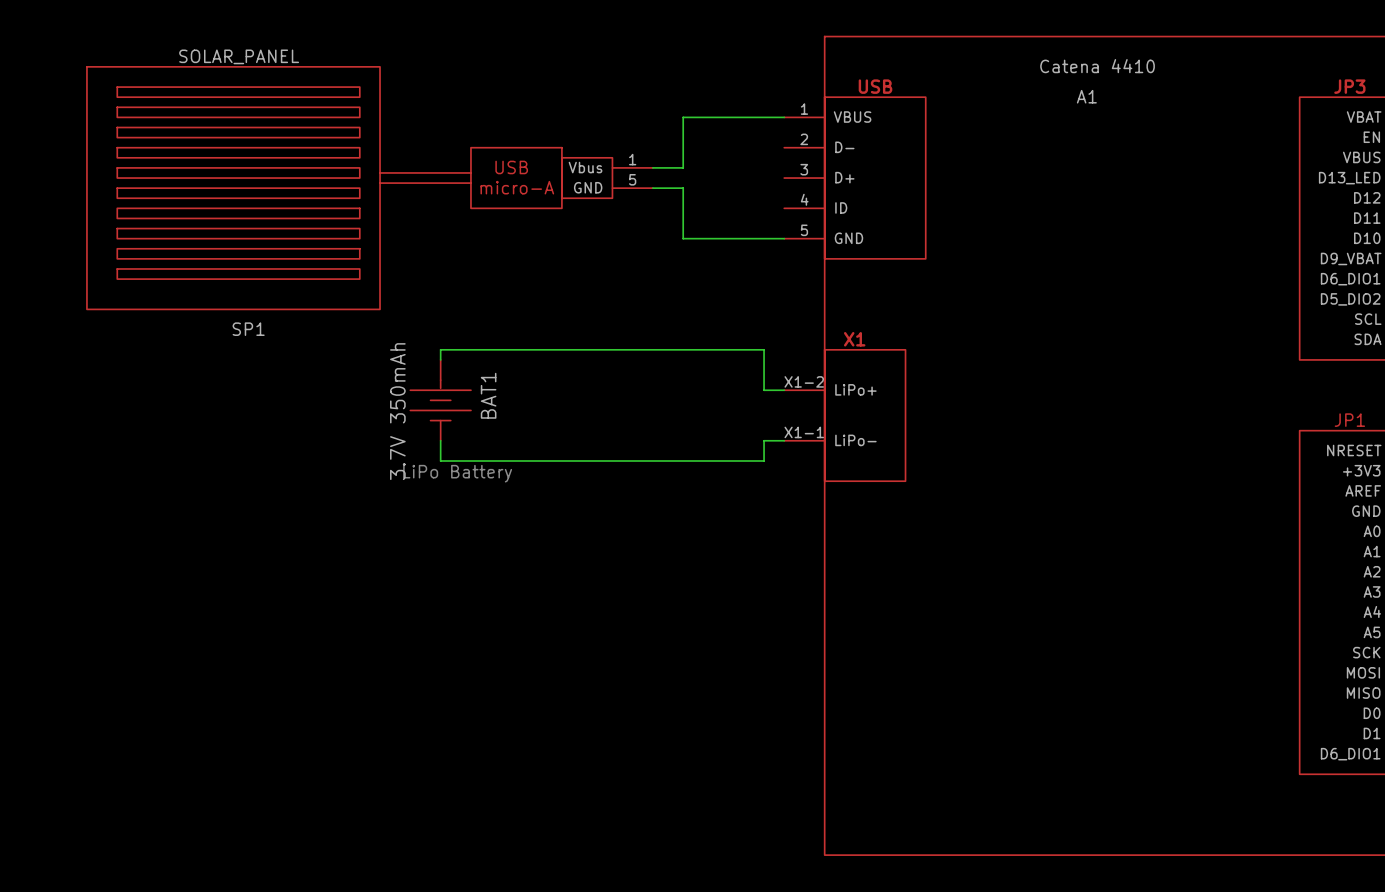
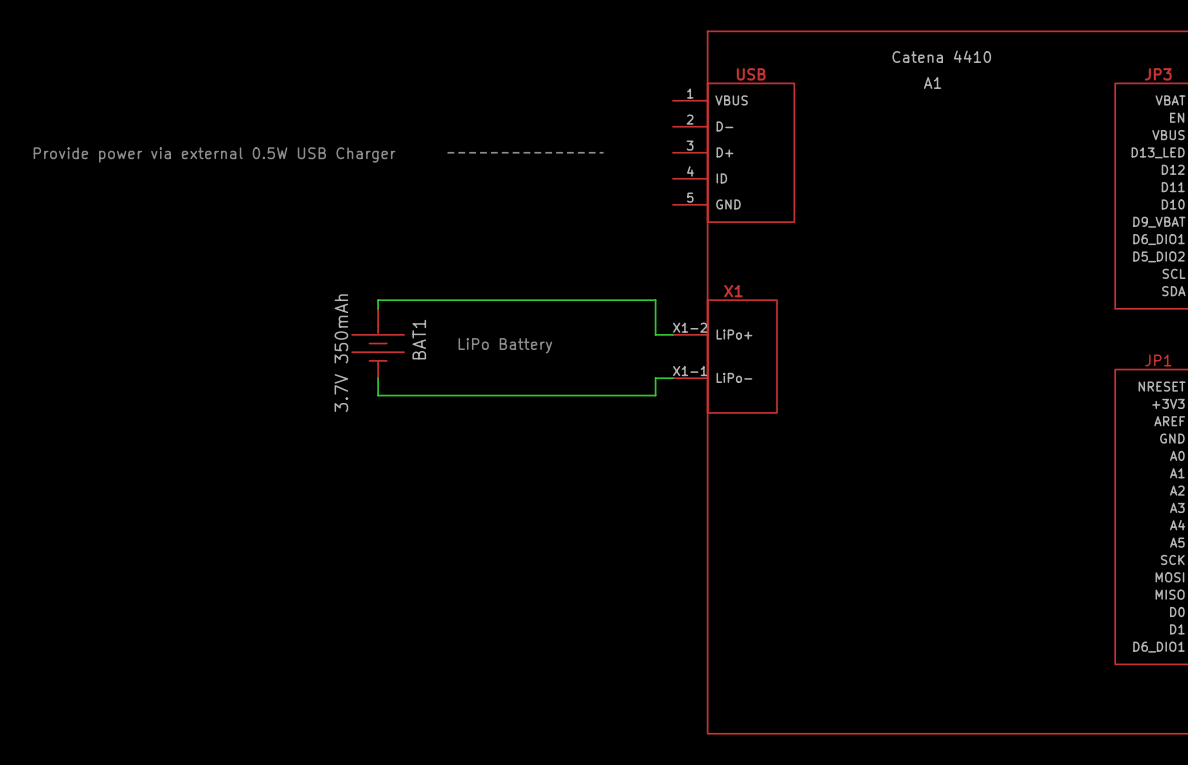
wire: (784, 117) (683, 117) (683, 167) (652, 167) -> none
line: none -> (447, 152) (603, 152)
text: none -> Provide power via external 0.5W USB Charger (214, 154)
SP1: SOLAR_PANEL (369, 188) -> none
wire: (652, 188) (683, 188) (683, 238) (784, 238) -> none
text position: LiPo Battery (457, 473) -> LiPo Battery (505, 345)

